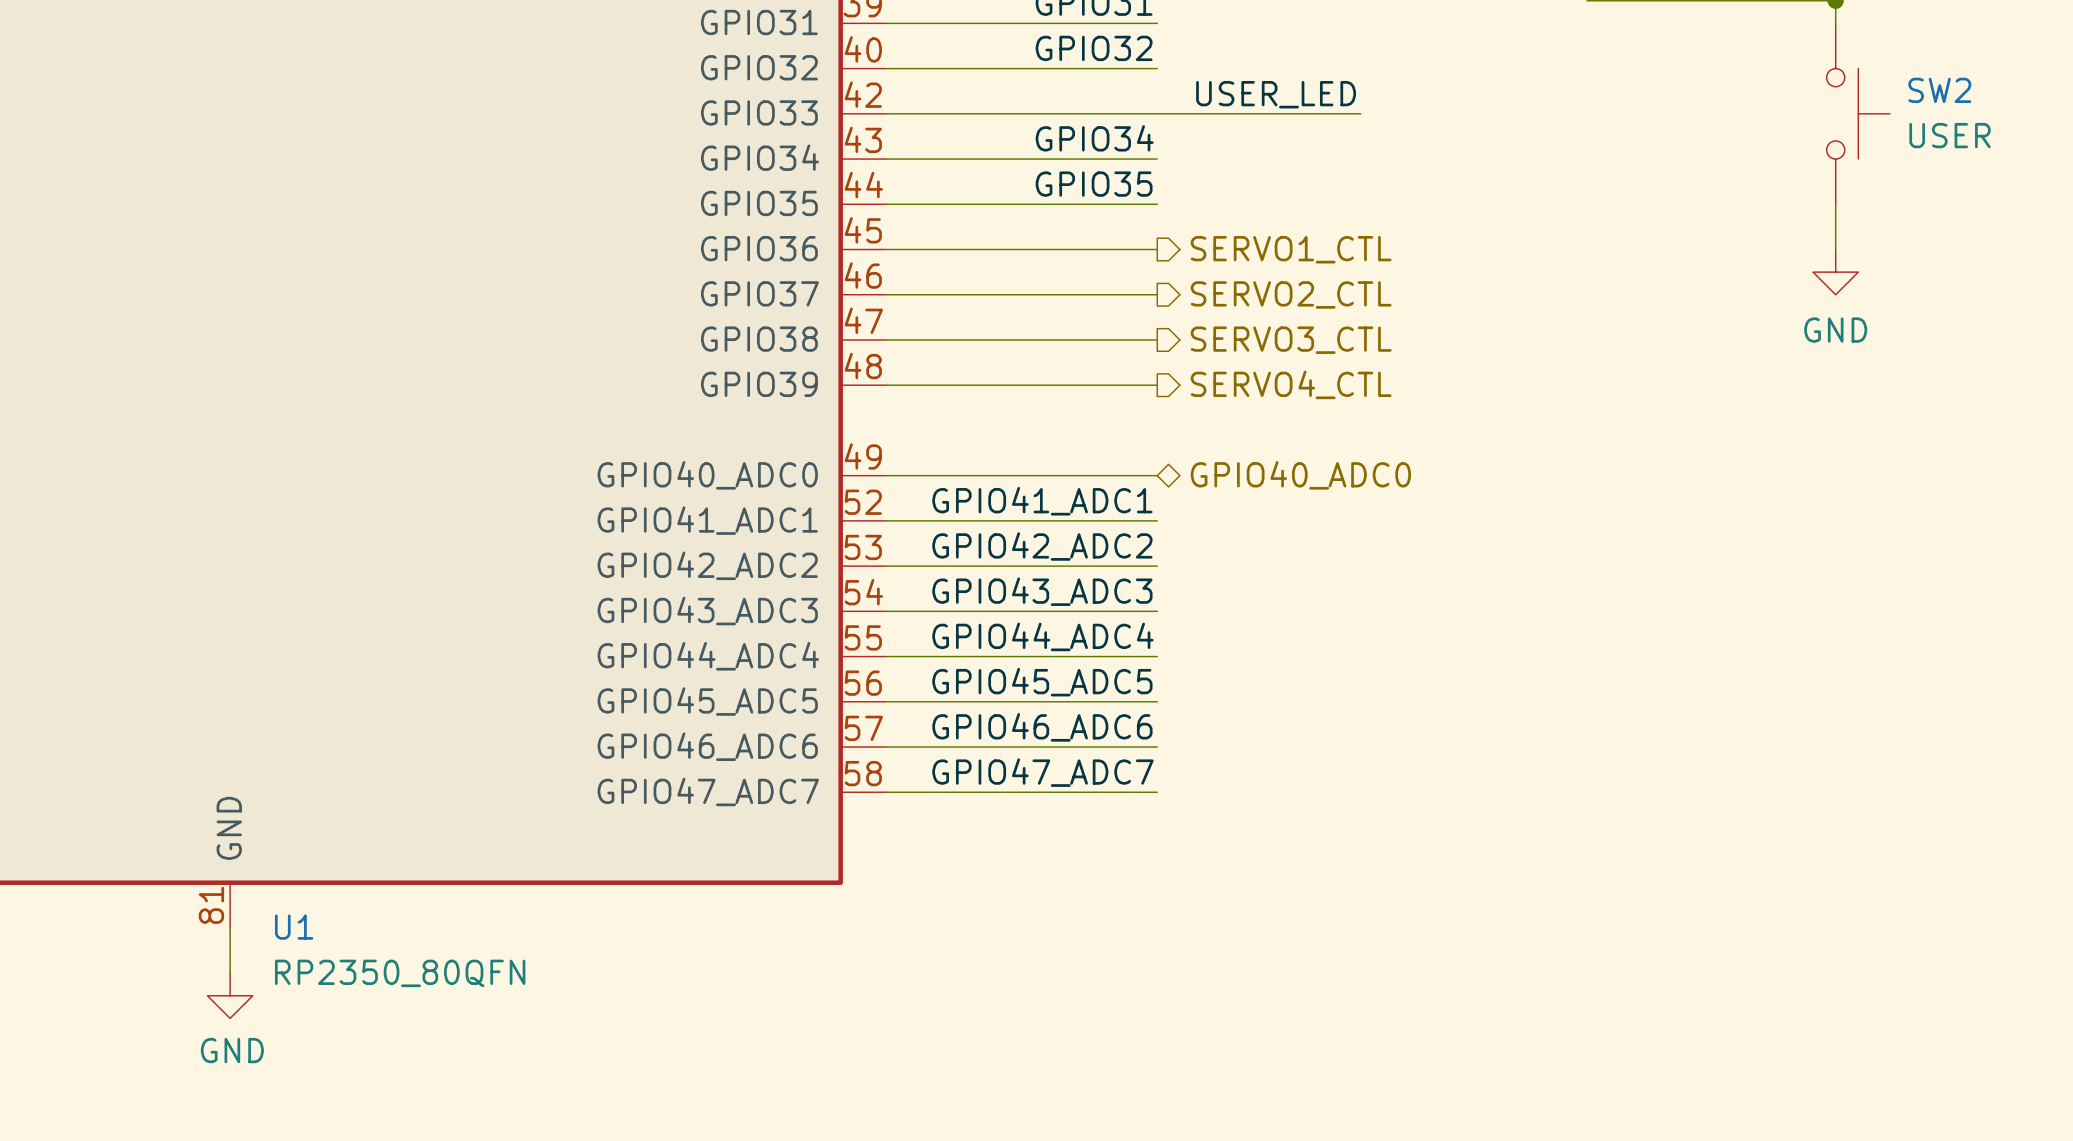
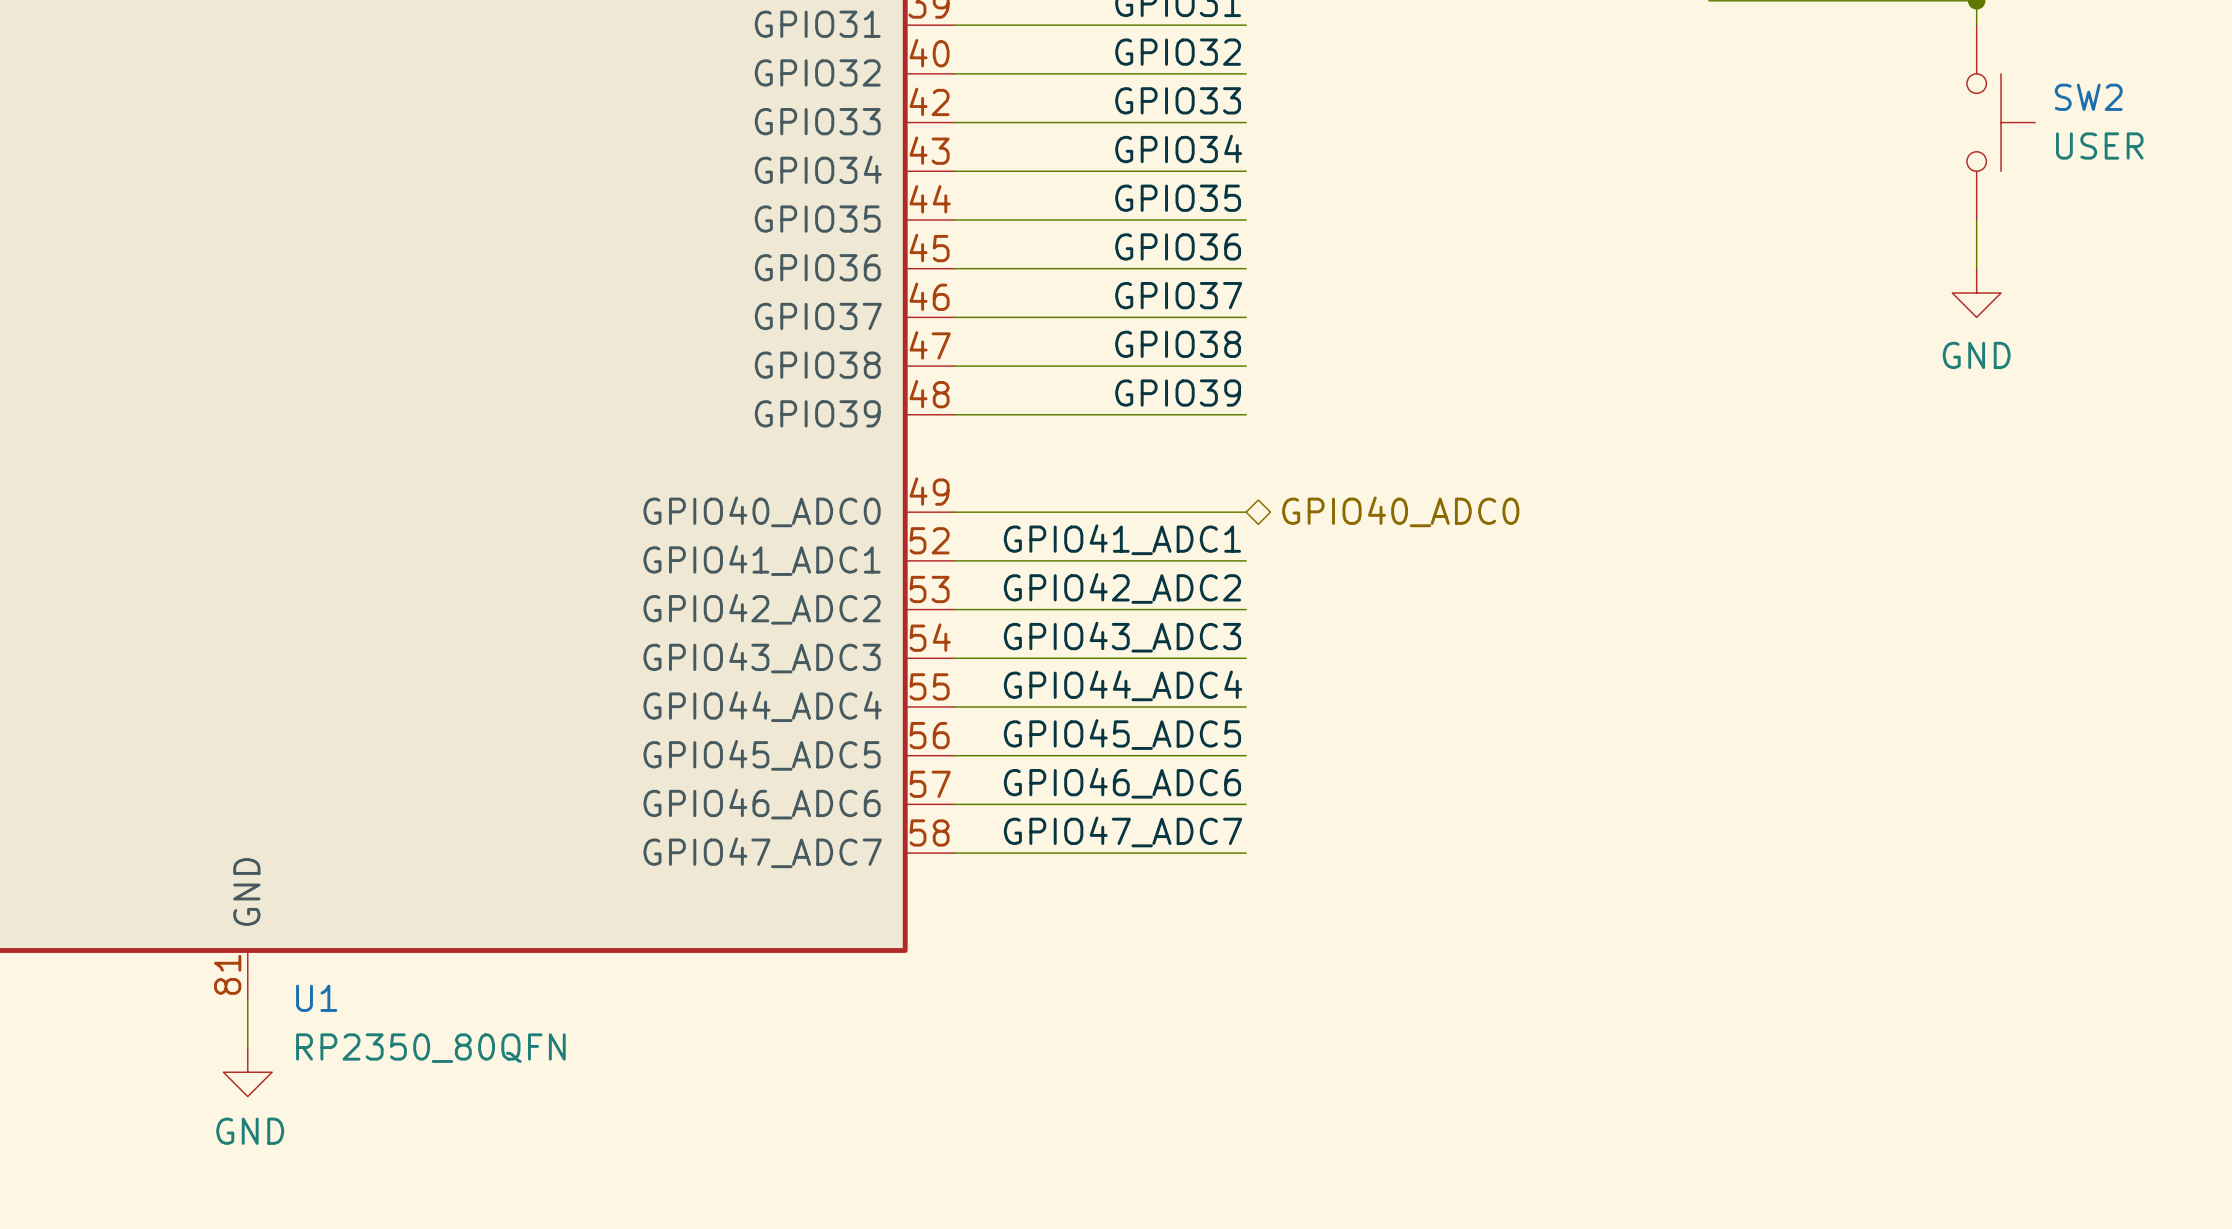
label: none -> GPIO33 (1178, 100)
label: USER_LED (1276, 94) -> none
wire: (1157, 113) (1360, 113) -> none
label: none -> GPIO36 (1178, 246)
hierarchical label: SERVO1_CTL (1291, 249) -> none
label: none -> GPIO37 (1178, 295)
hierarchical label: SERVO2_CTL (1291, 294) -> none
label: none -> GPIO38 (1178, 344)
hierarchical label: SERVO3_CTL (1291, 340) -> none
label: none -> GPIO39 (1178, 393)
hierarchical label: SERVO4_CTL (1291, 384) -> none

